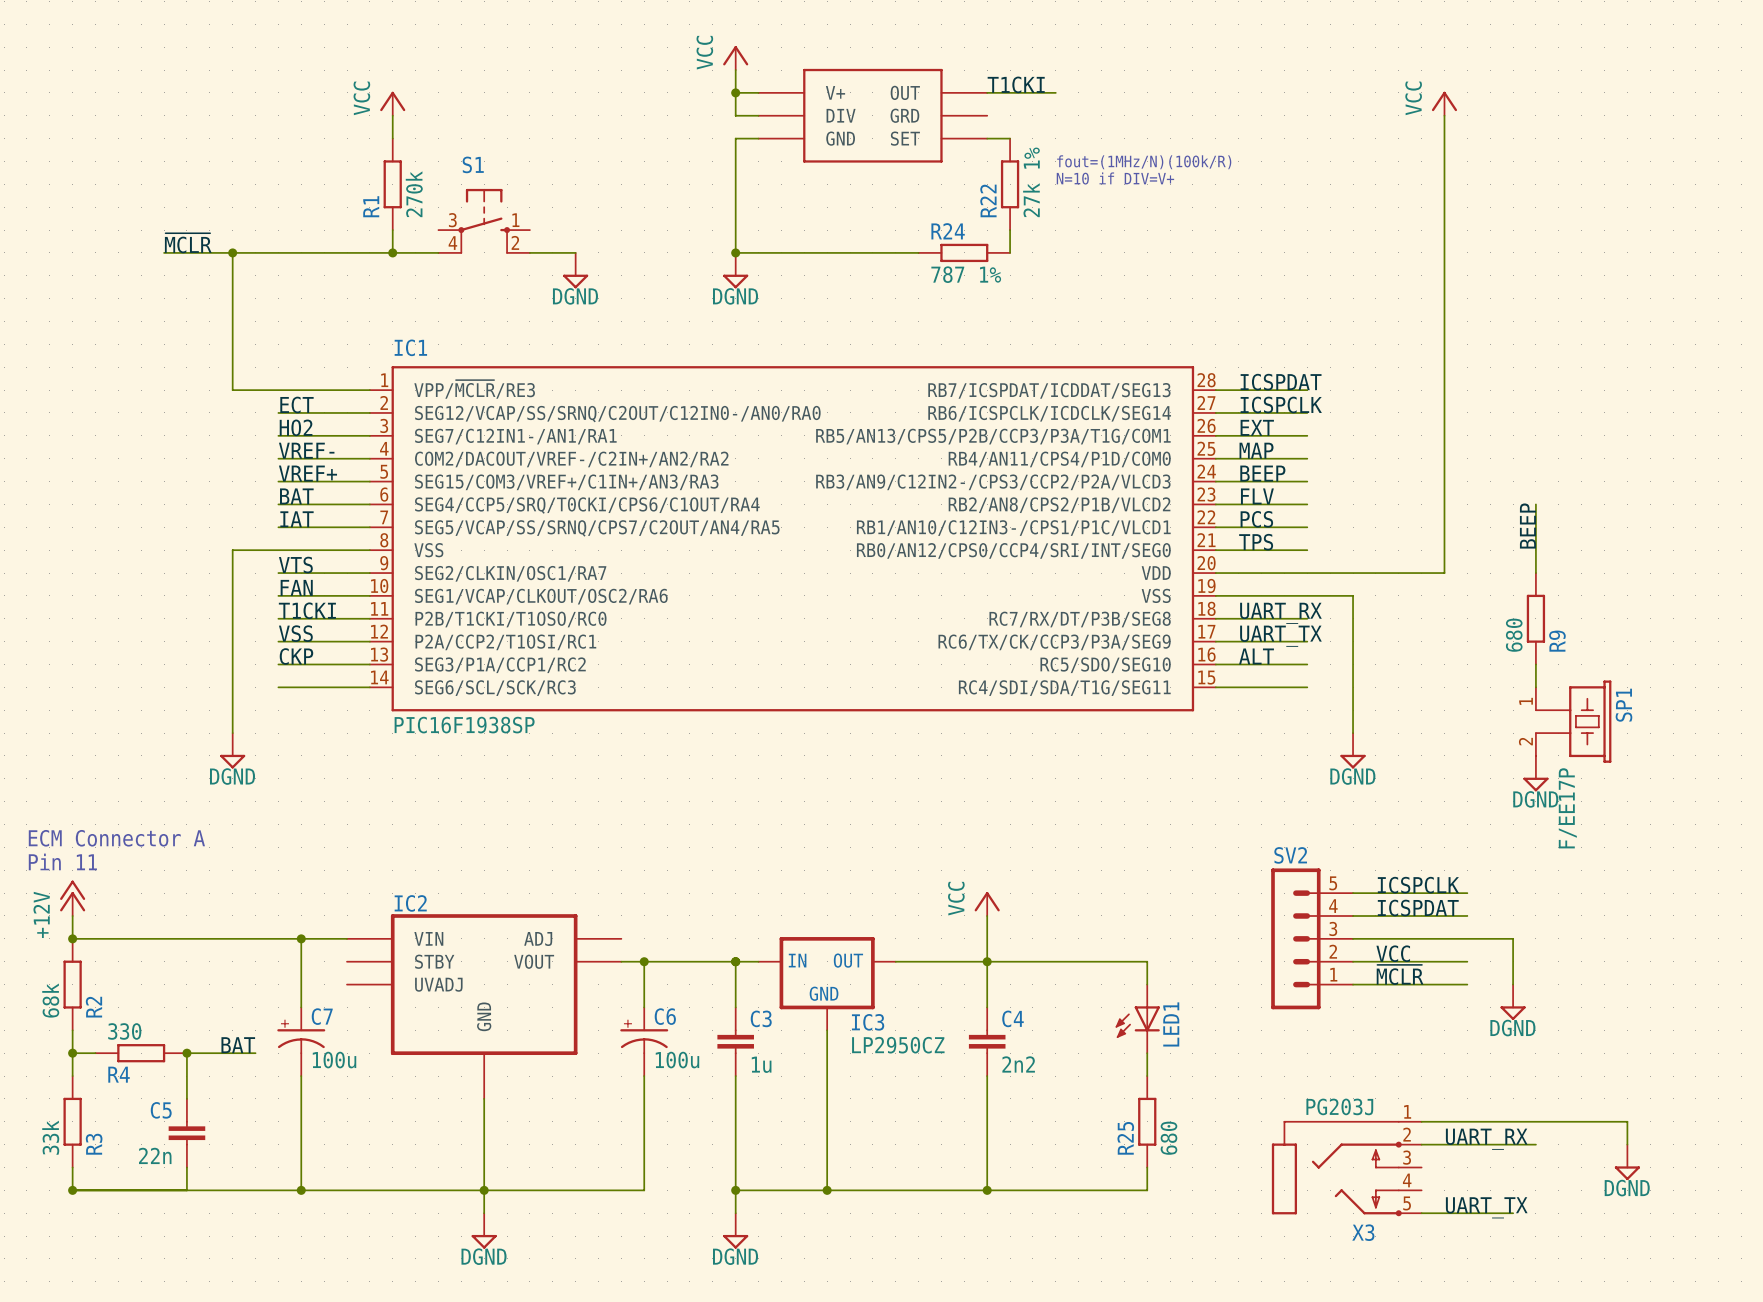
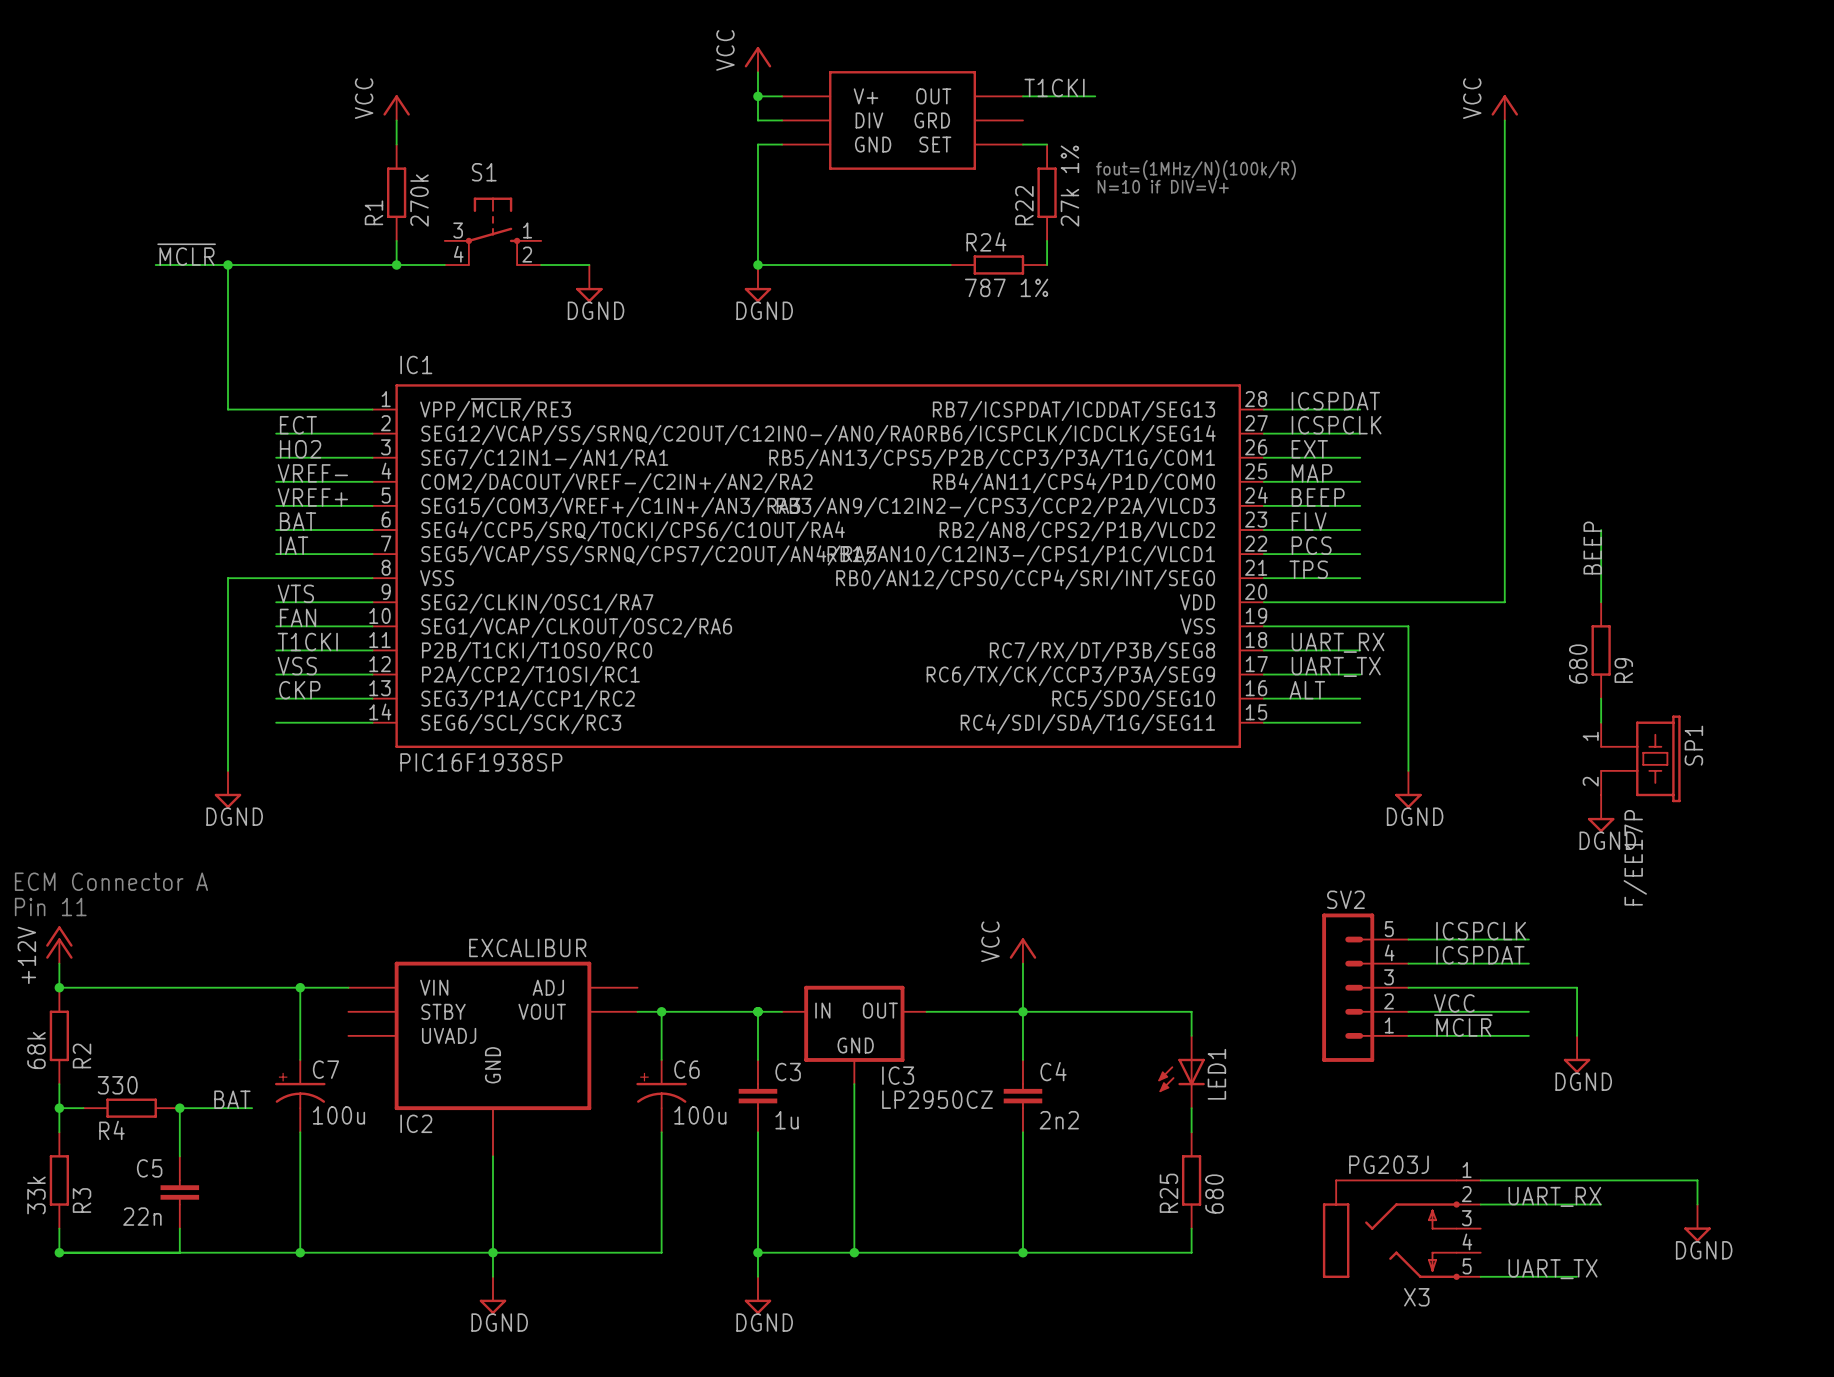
IC2 value: none -> EXCALIBUR (527, 947)
IC2 name position: IC2 (410, 903) -> IC2 (416, 1123)

